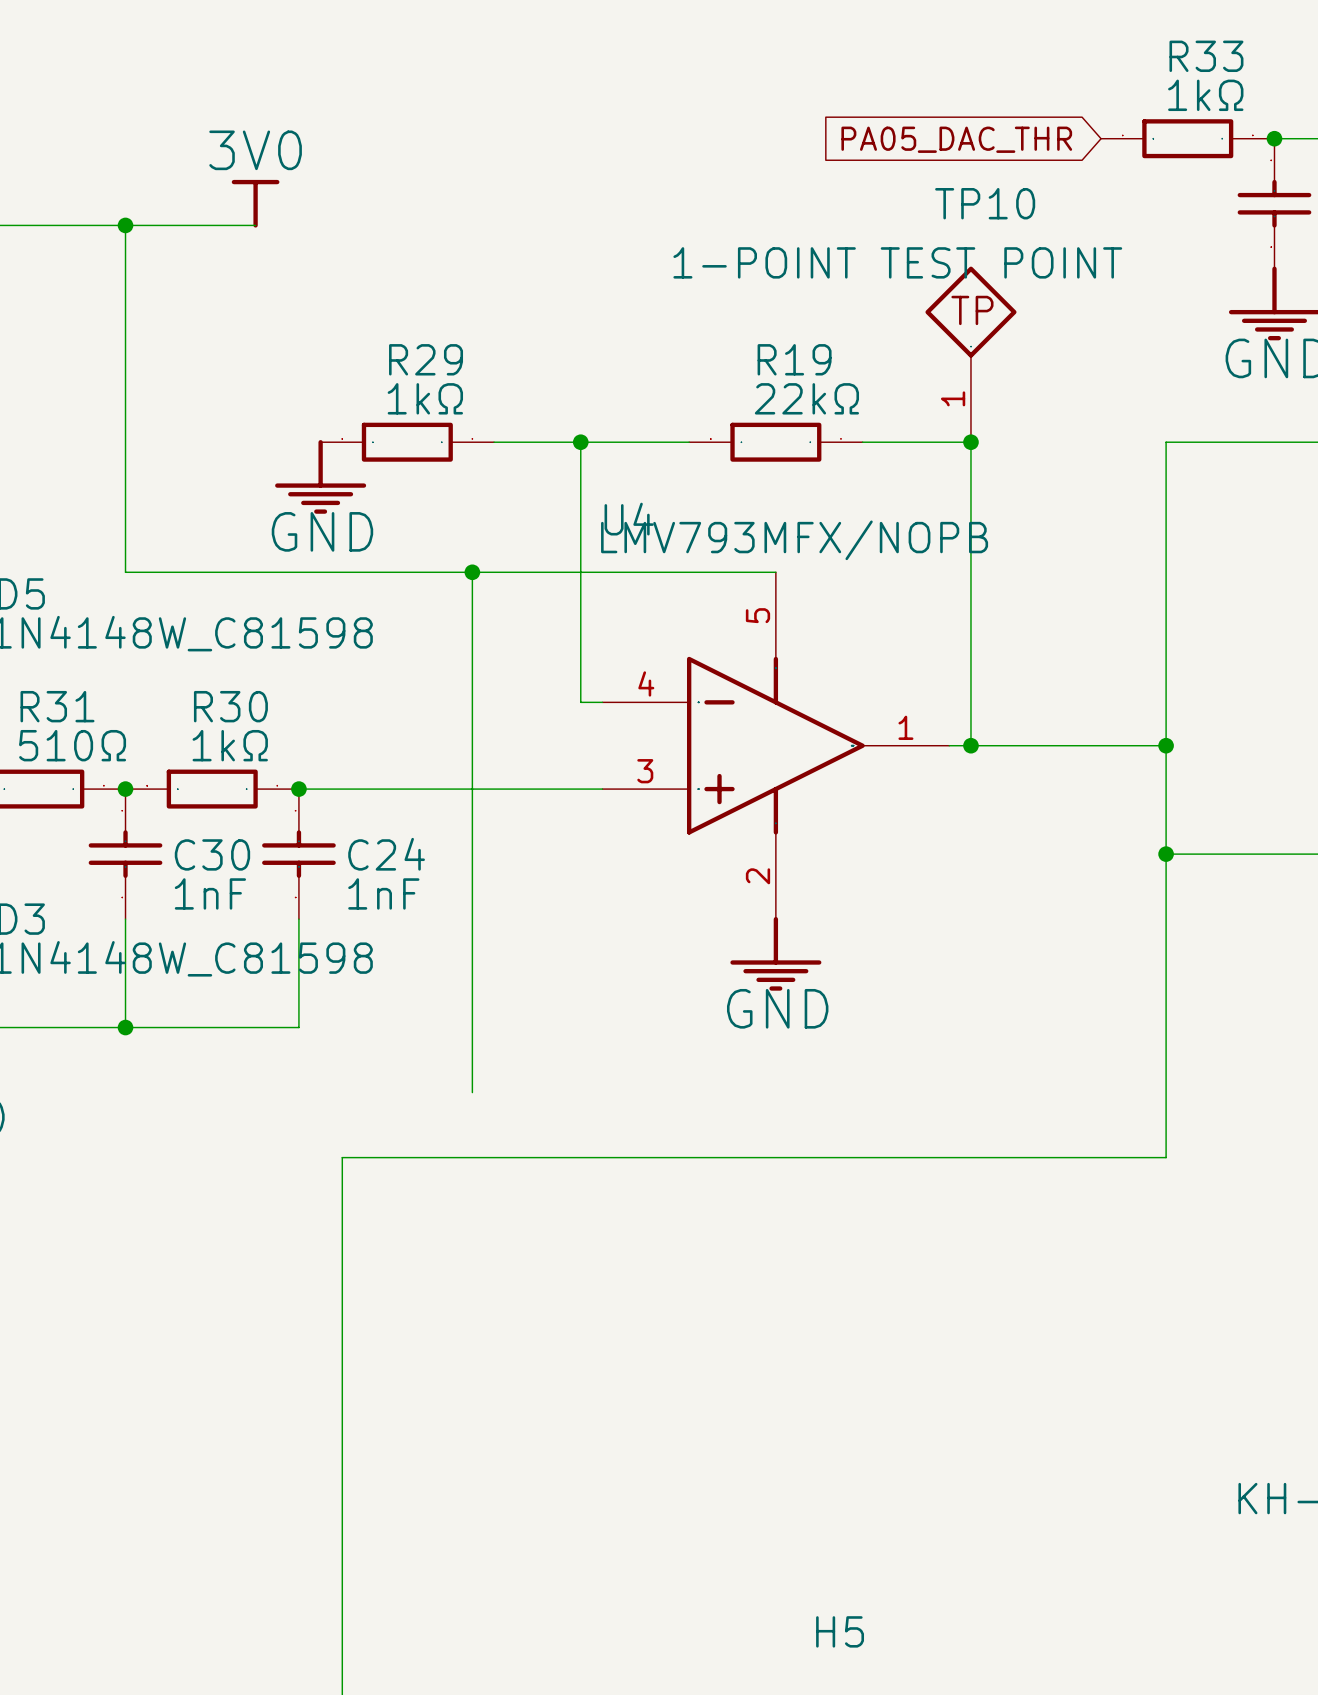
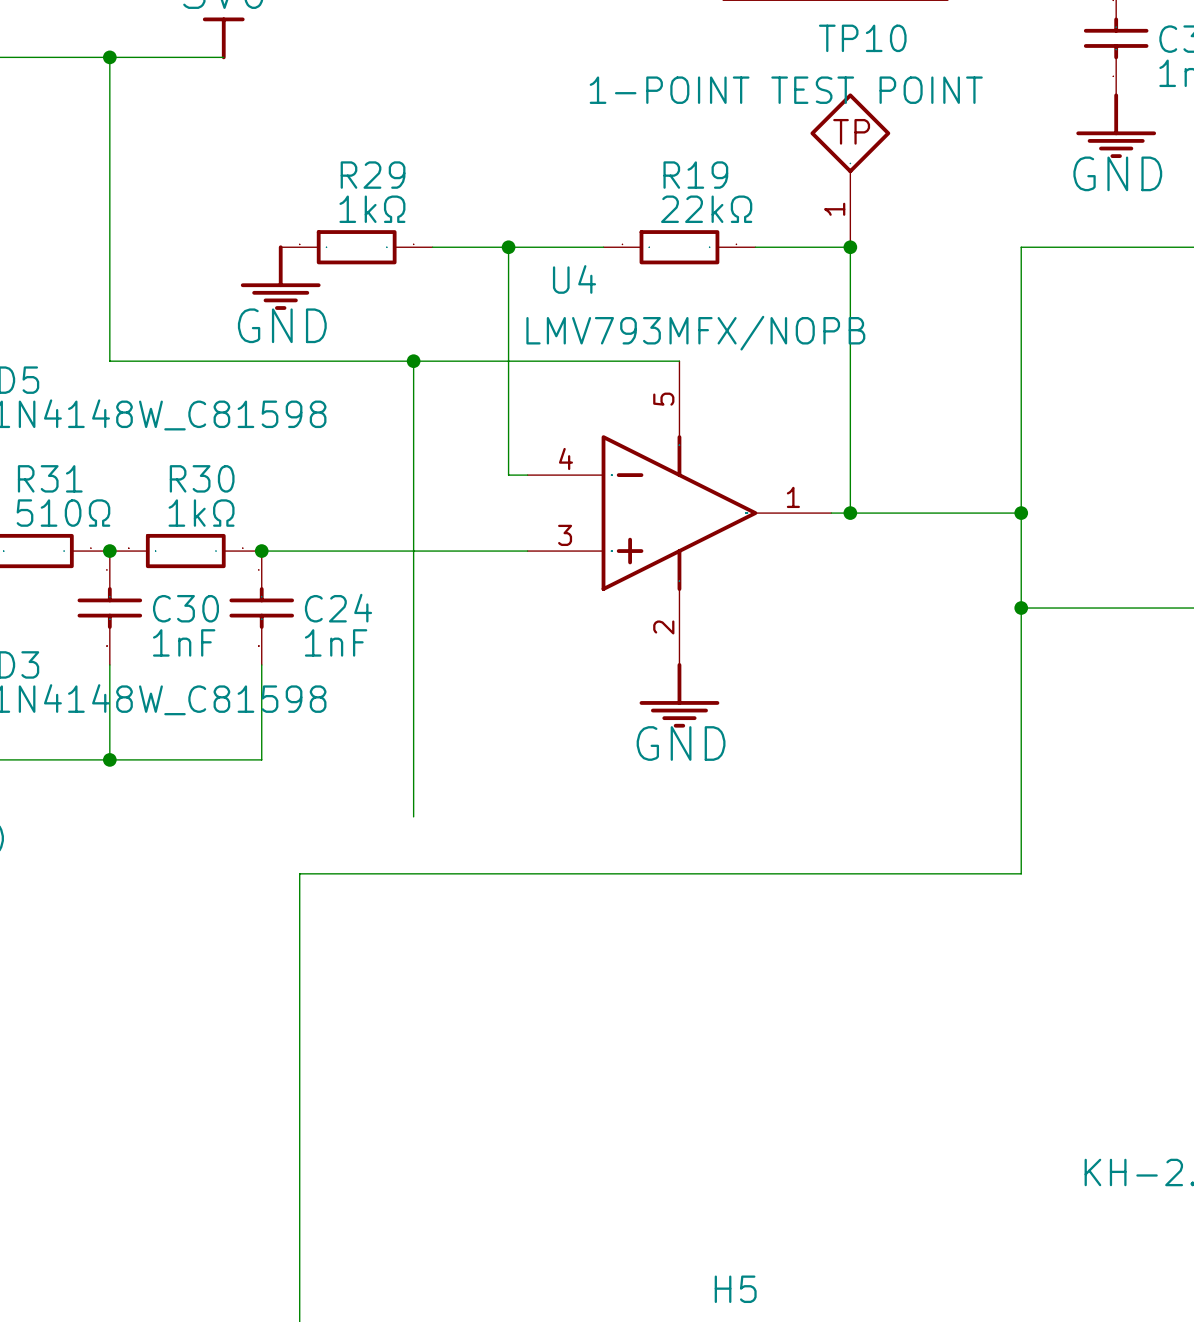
U4 name position: U4 (629, 519) -> U4 (574, 279)

